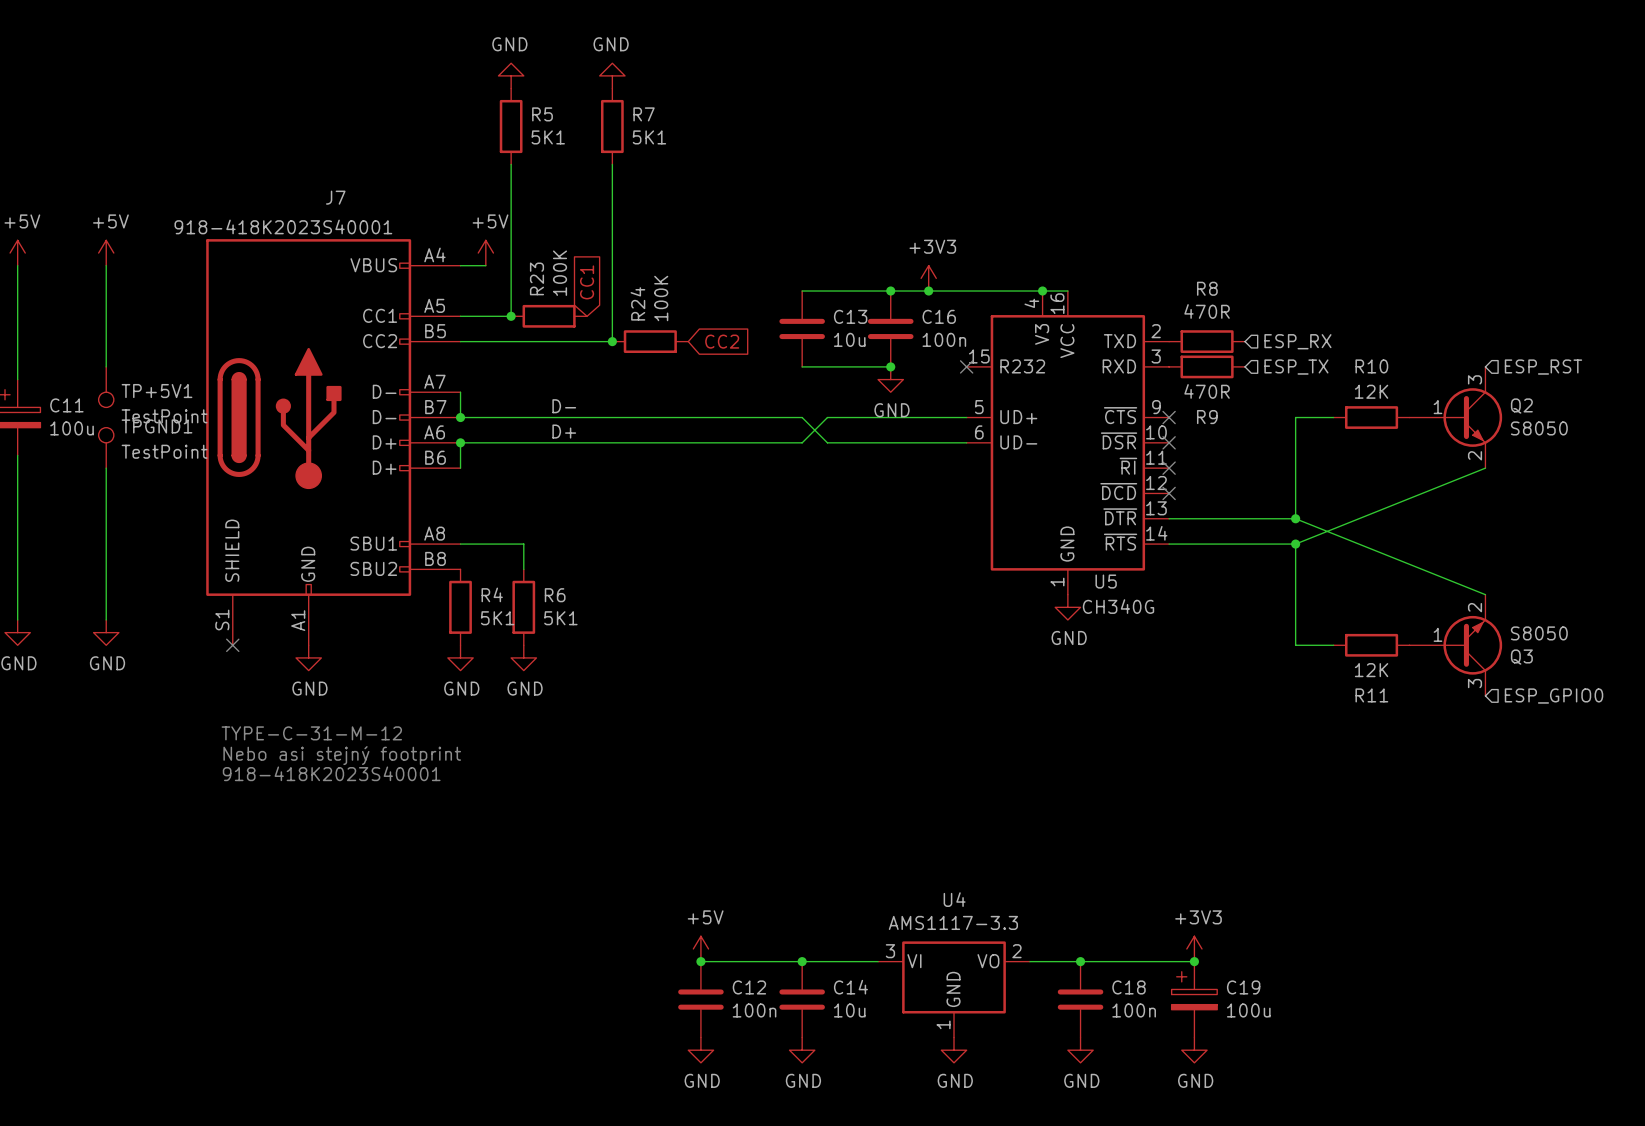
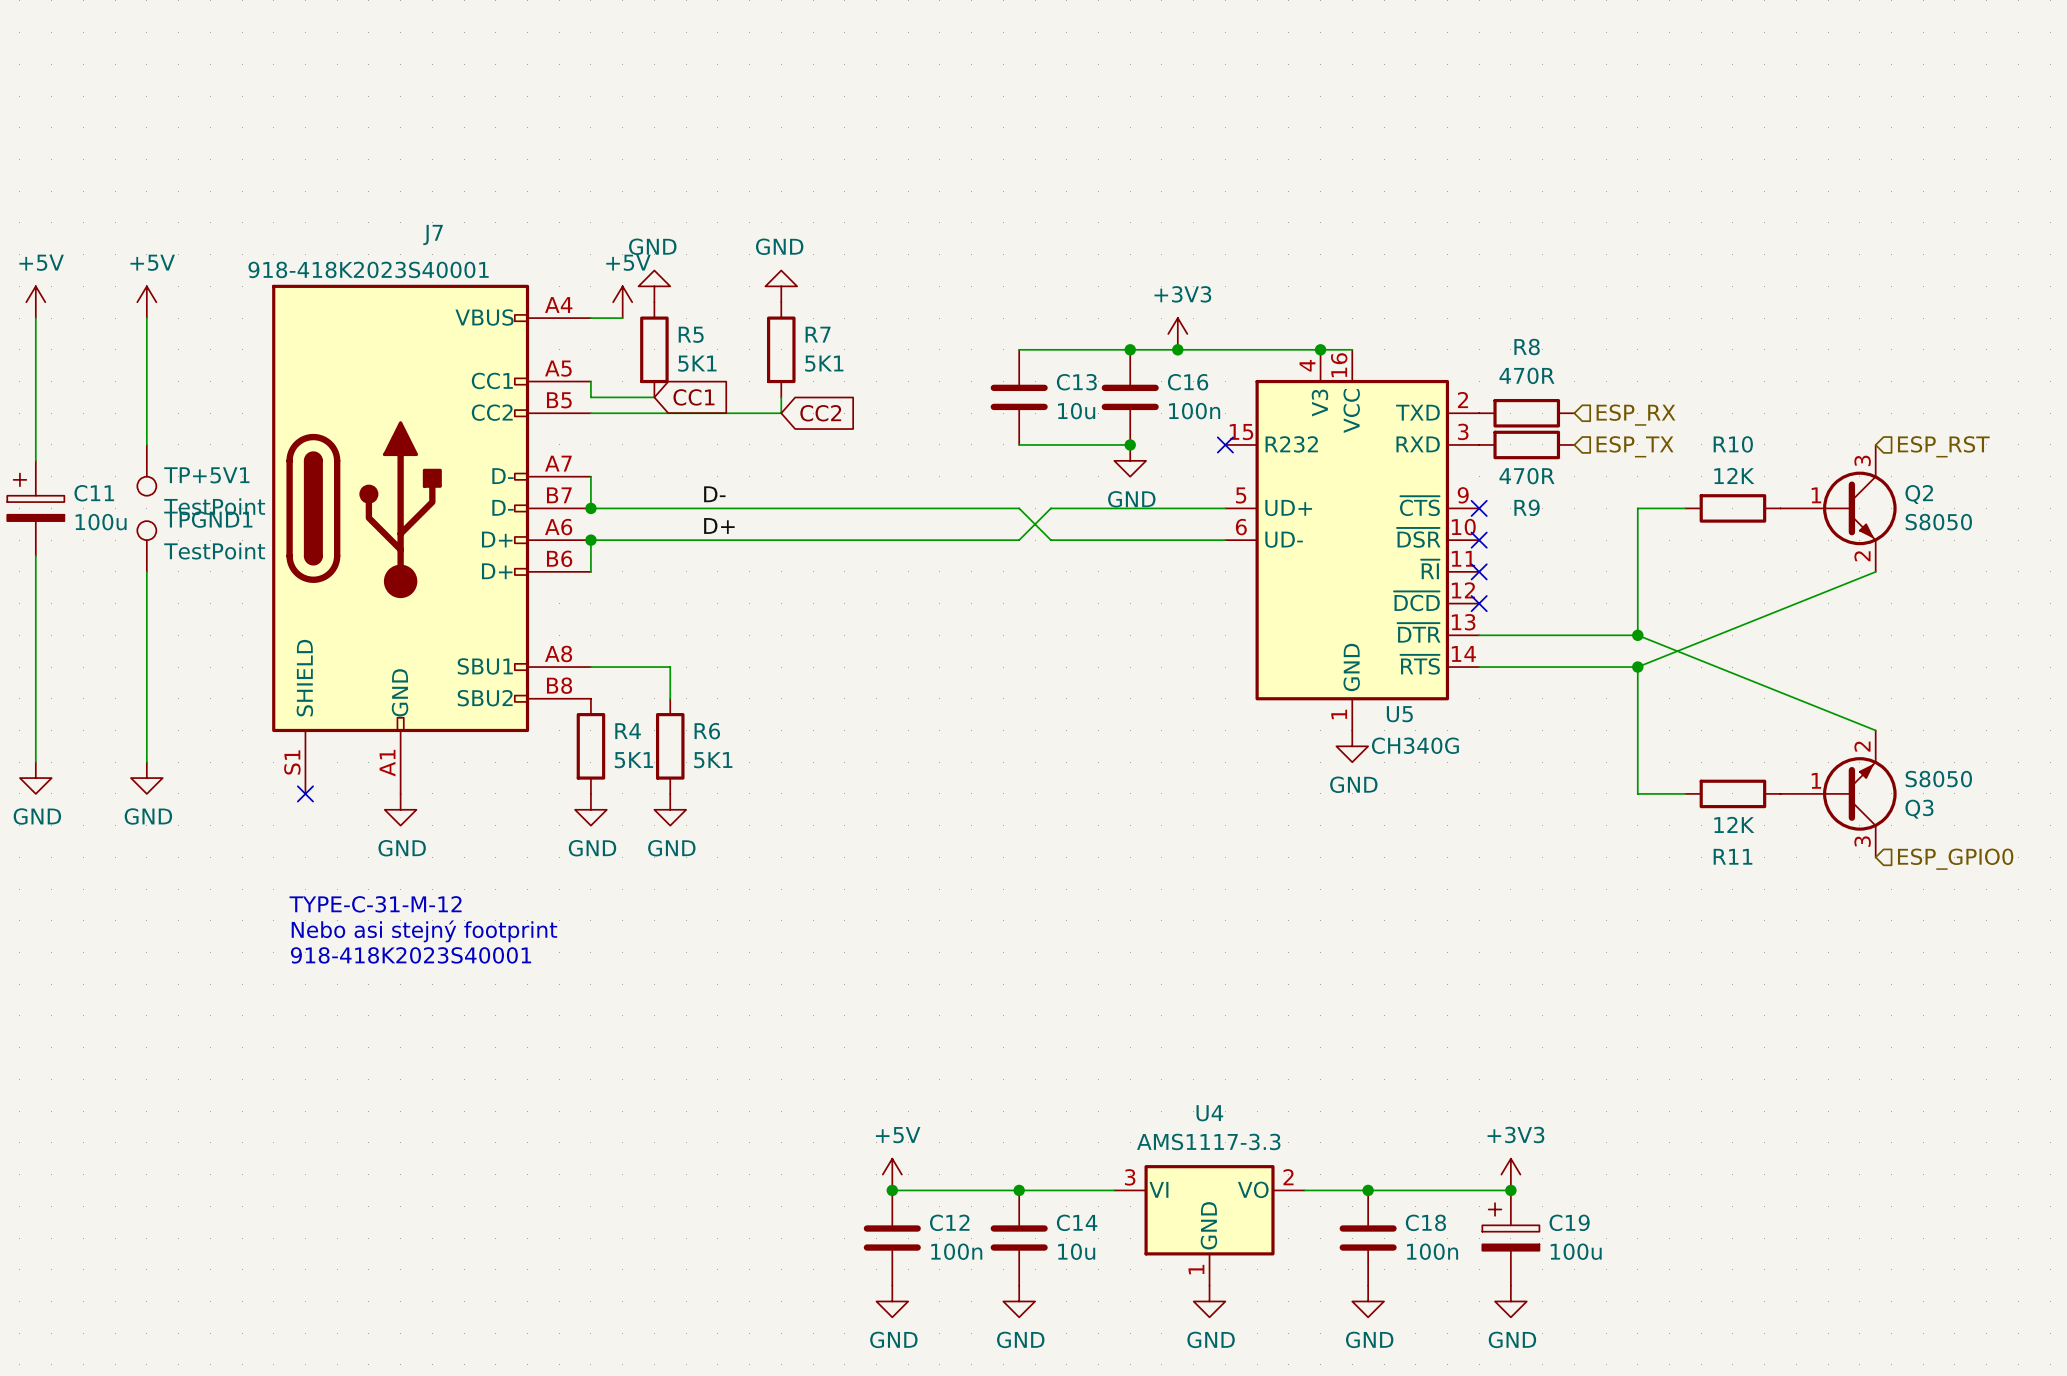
power symbol: GND (511, 75) -> none
power symbol: GND (612, 75) -> none
R5 position: (511, 126) -> (654, 349)
R7 position: (612, 126) -> (781, 349)
wire: (511, 164) (511, 316) (460, 316) -> (654, 397) (590, 397) (590, 381)
wire: (612, 164) (612, 328) -> none
power symbol: none -> GND (654, 286)
power symbol: none -> GND (781, 286)
global label rotation: 0° (587, 282) -> 90° clockwise (693, 397)
junction: (511, 316) -> none
R23: 100K (549, 316) -> none
junction: (612, 341) -> none
R24: 100K (650, 341) -> none
global label position: CC2 (722, 341) -> CC2 (820, 413)

